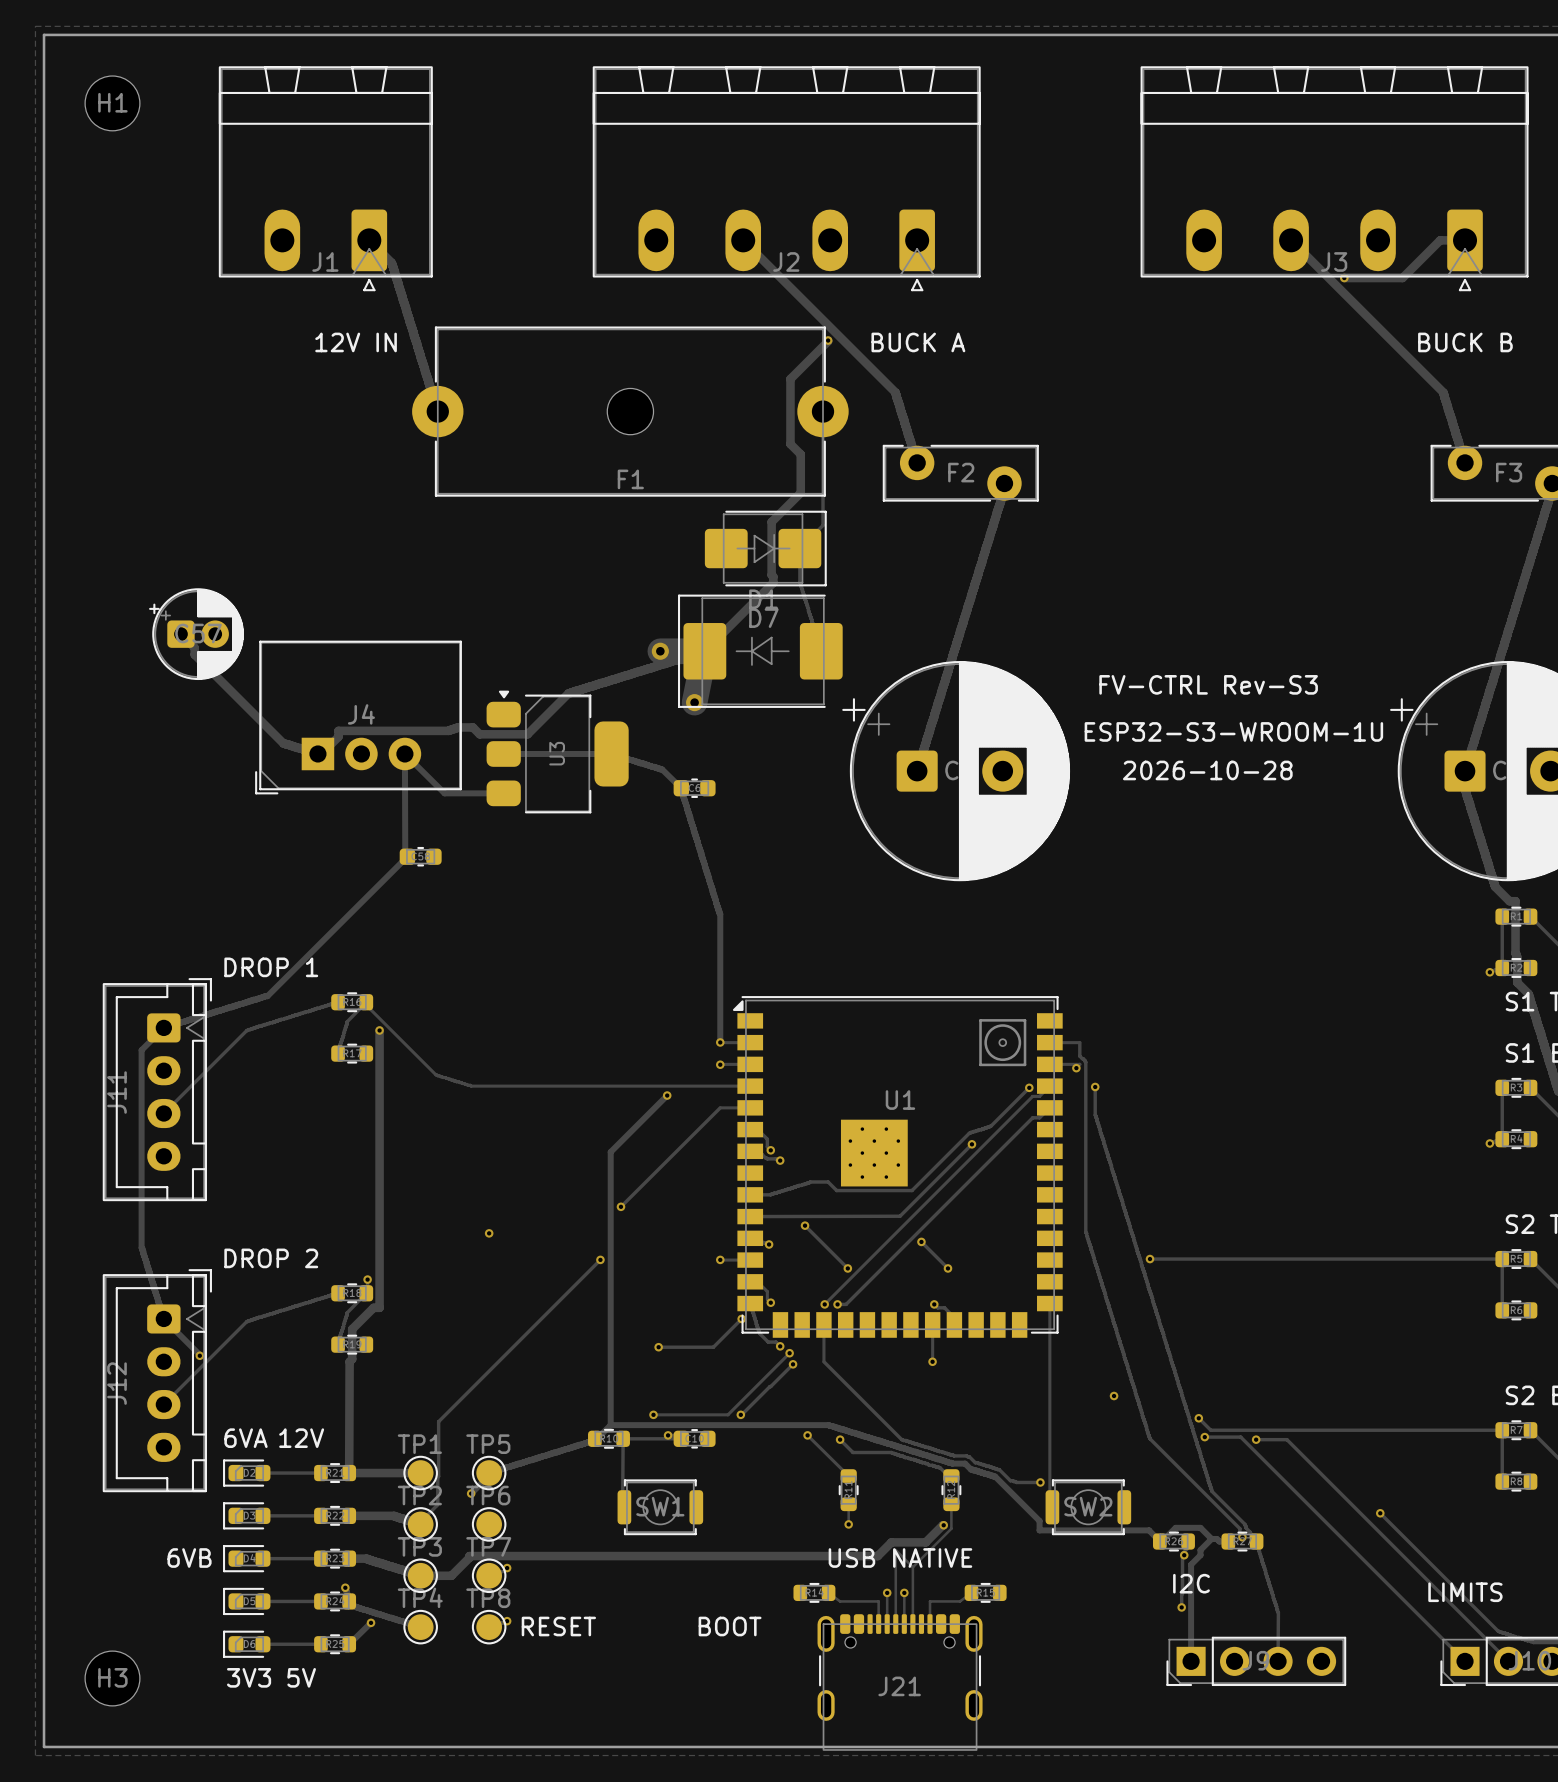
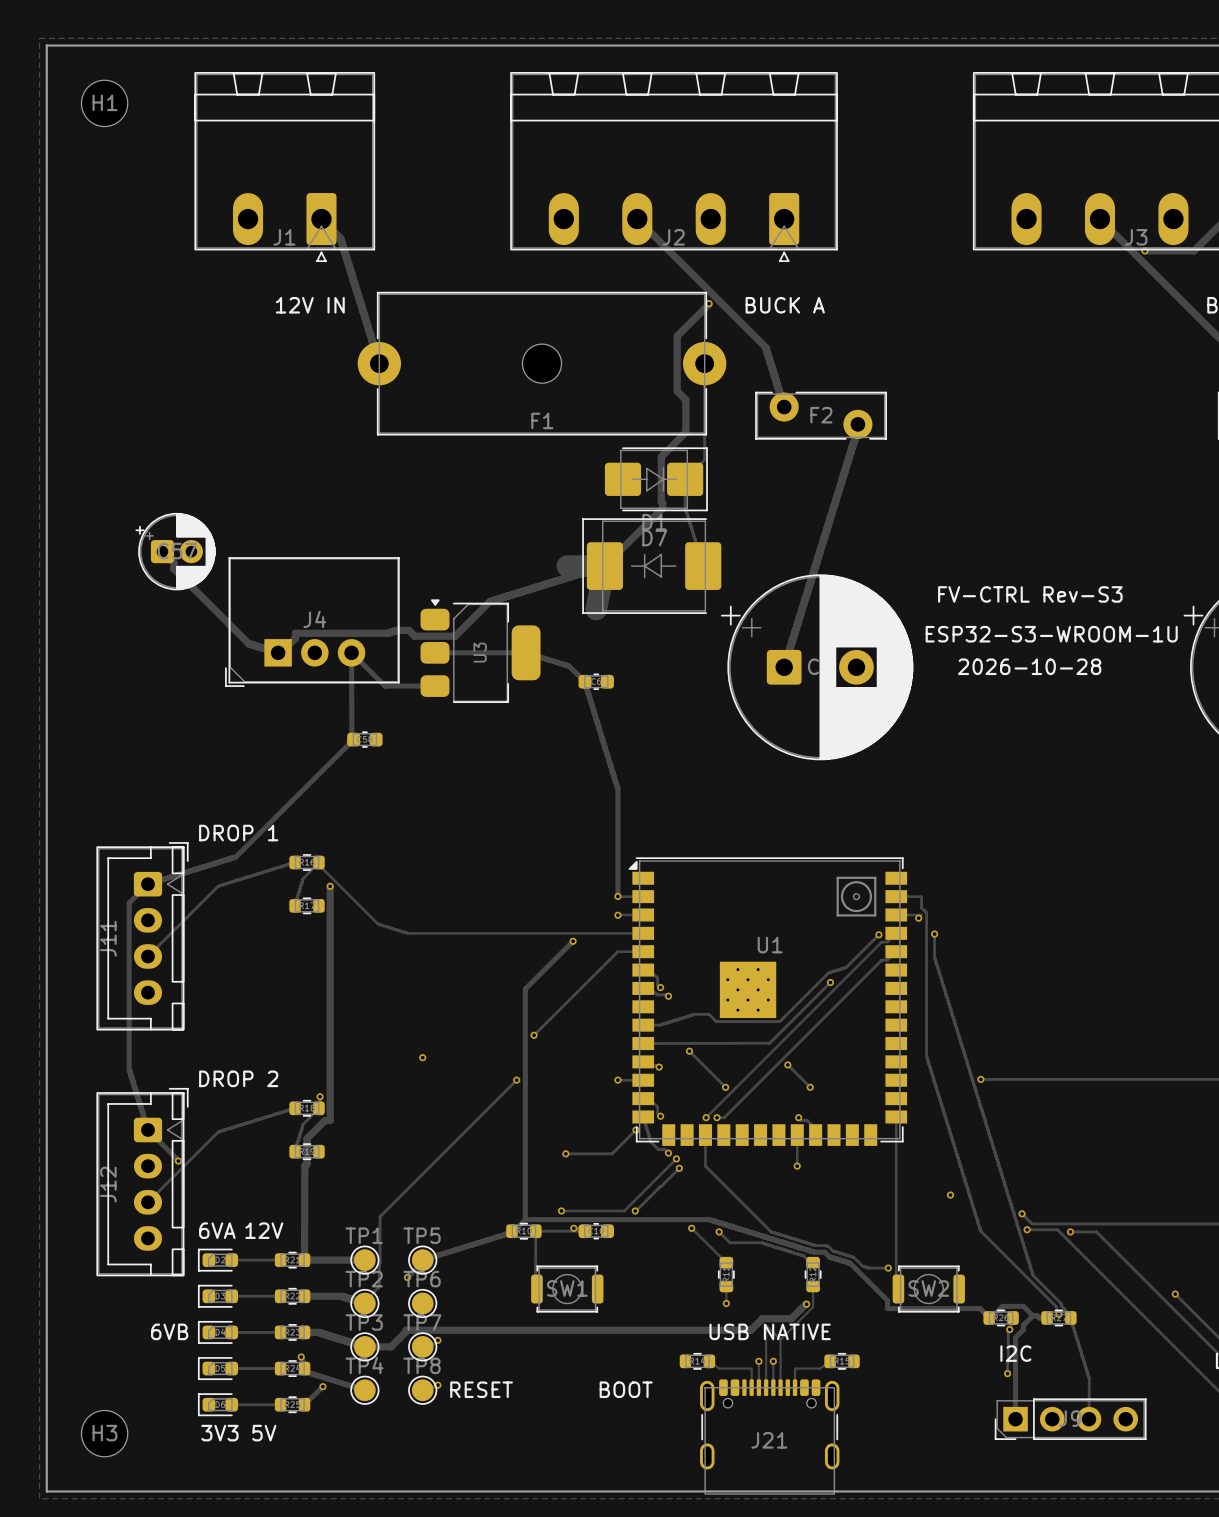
via: (660, 651) -> none
via: (694, 702) -> none

